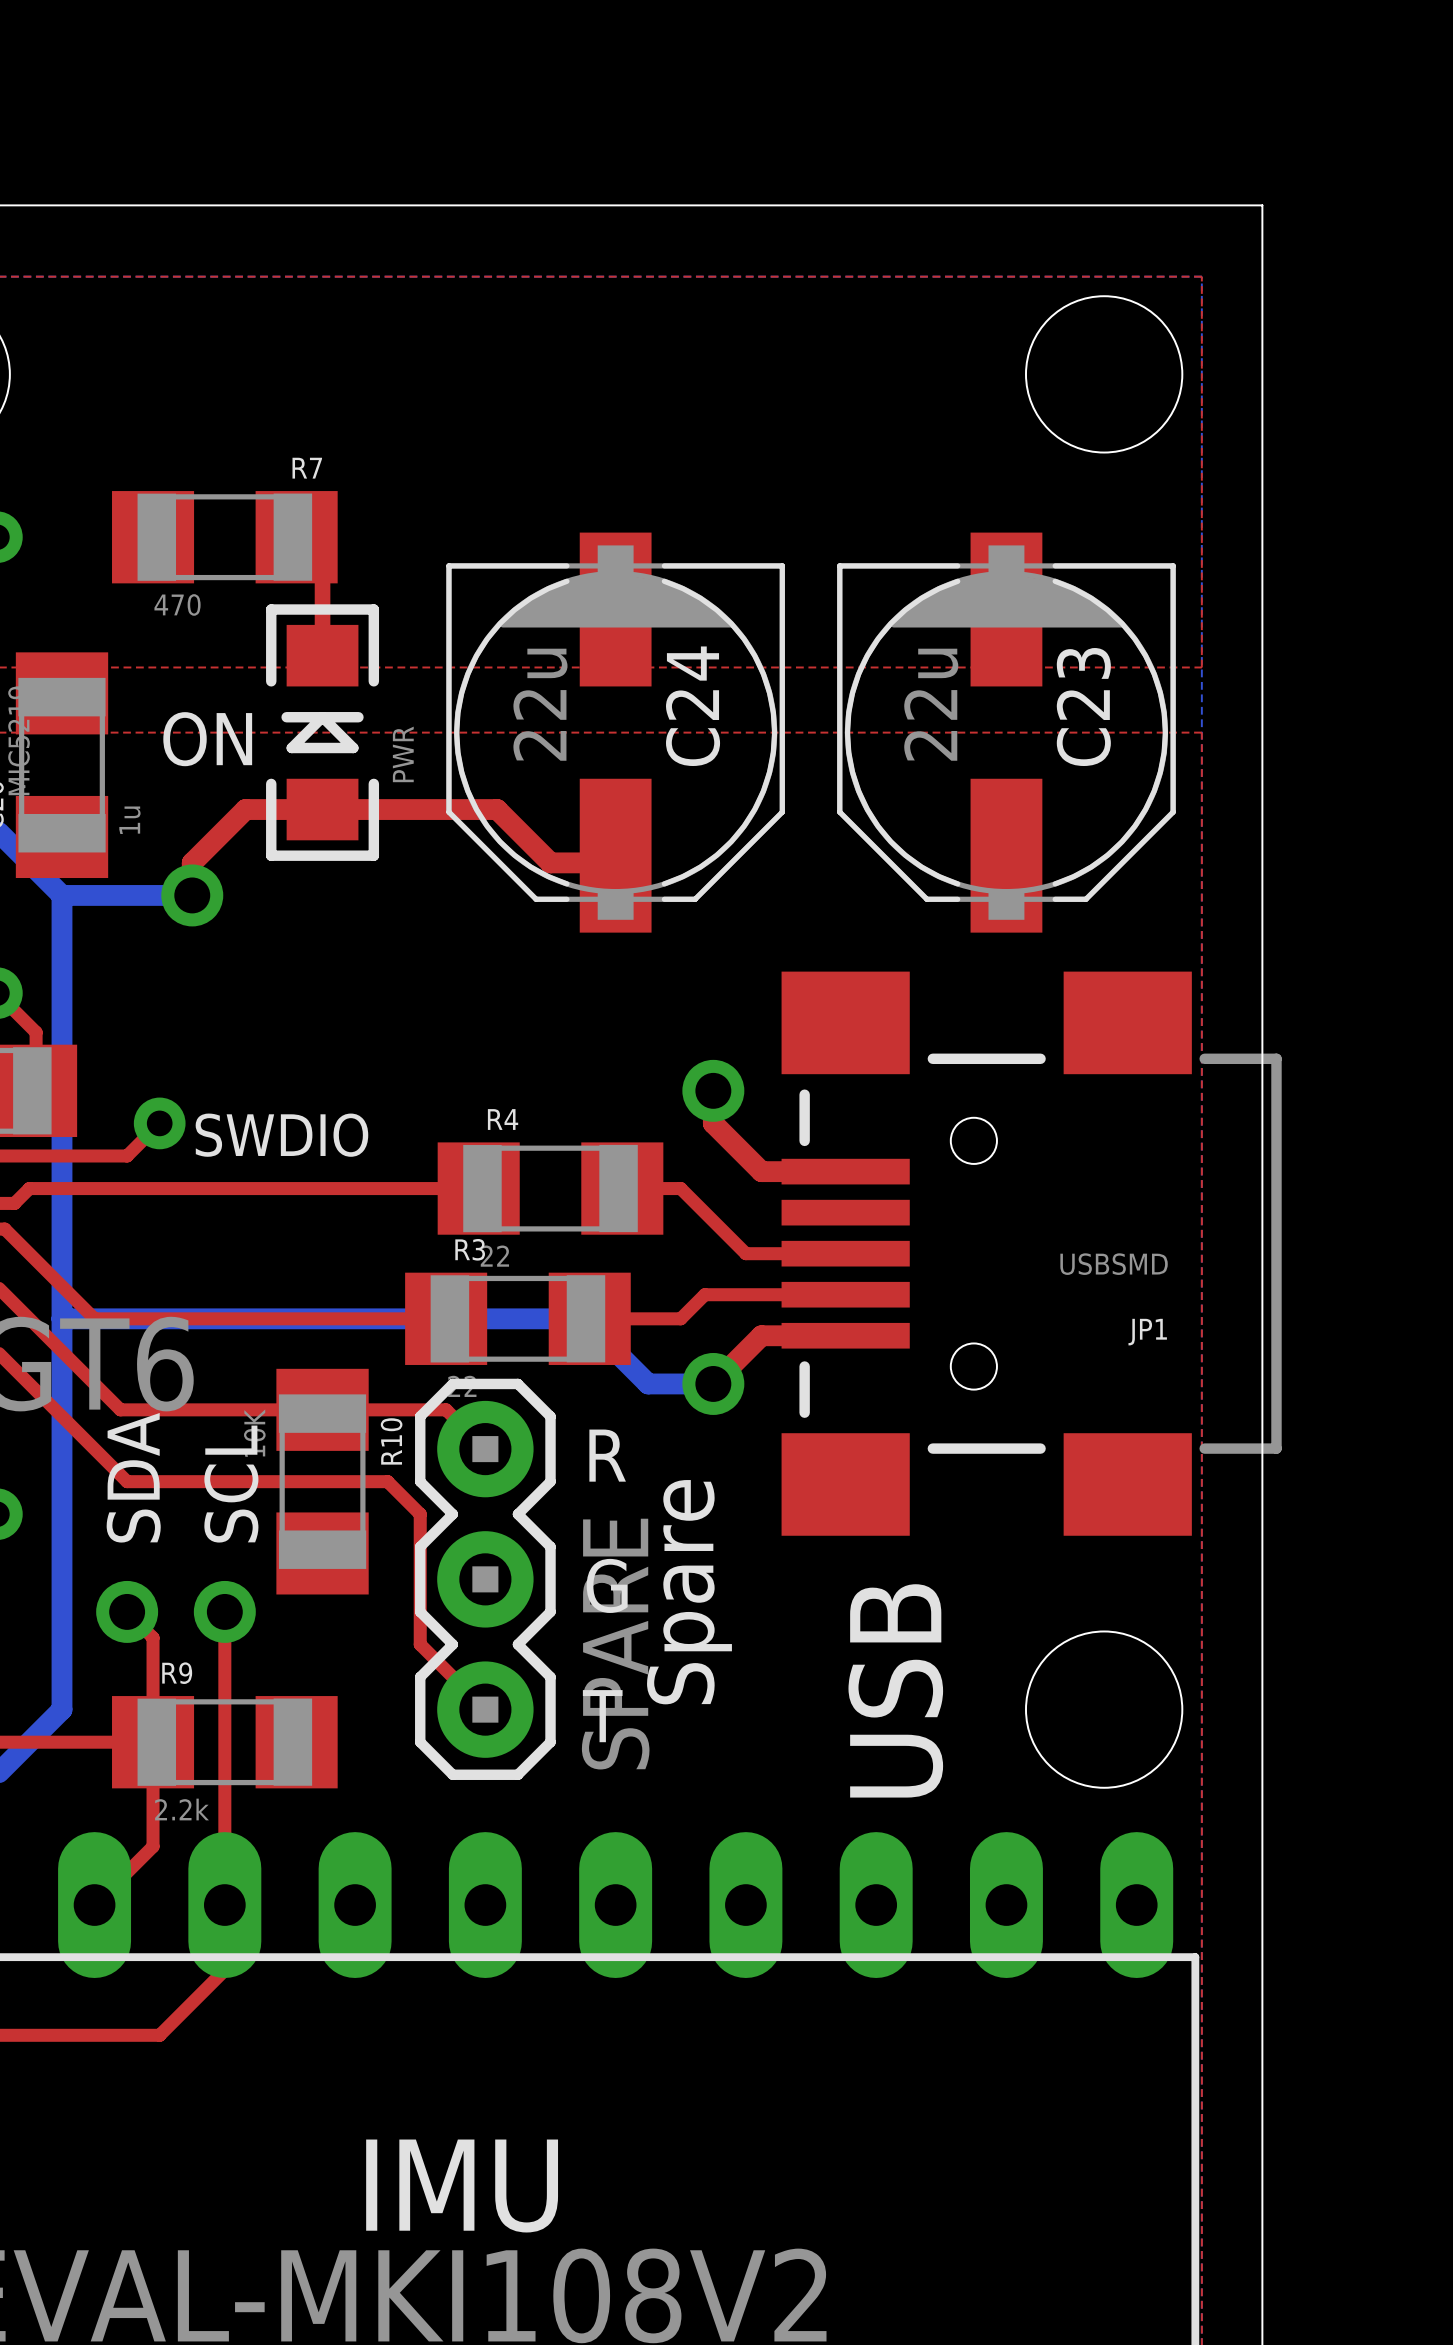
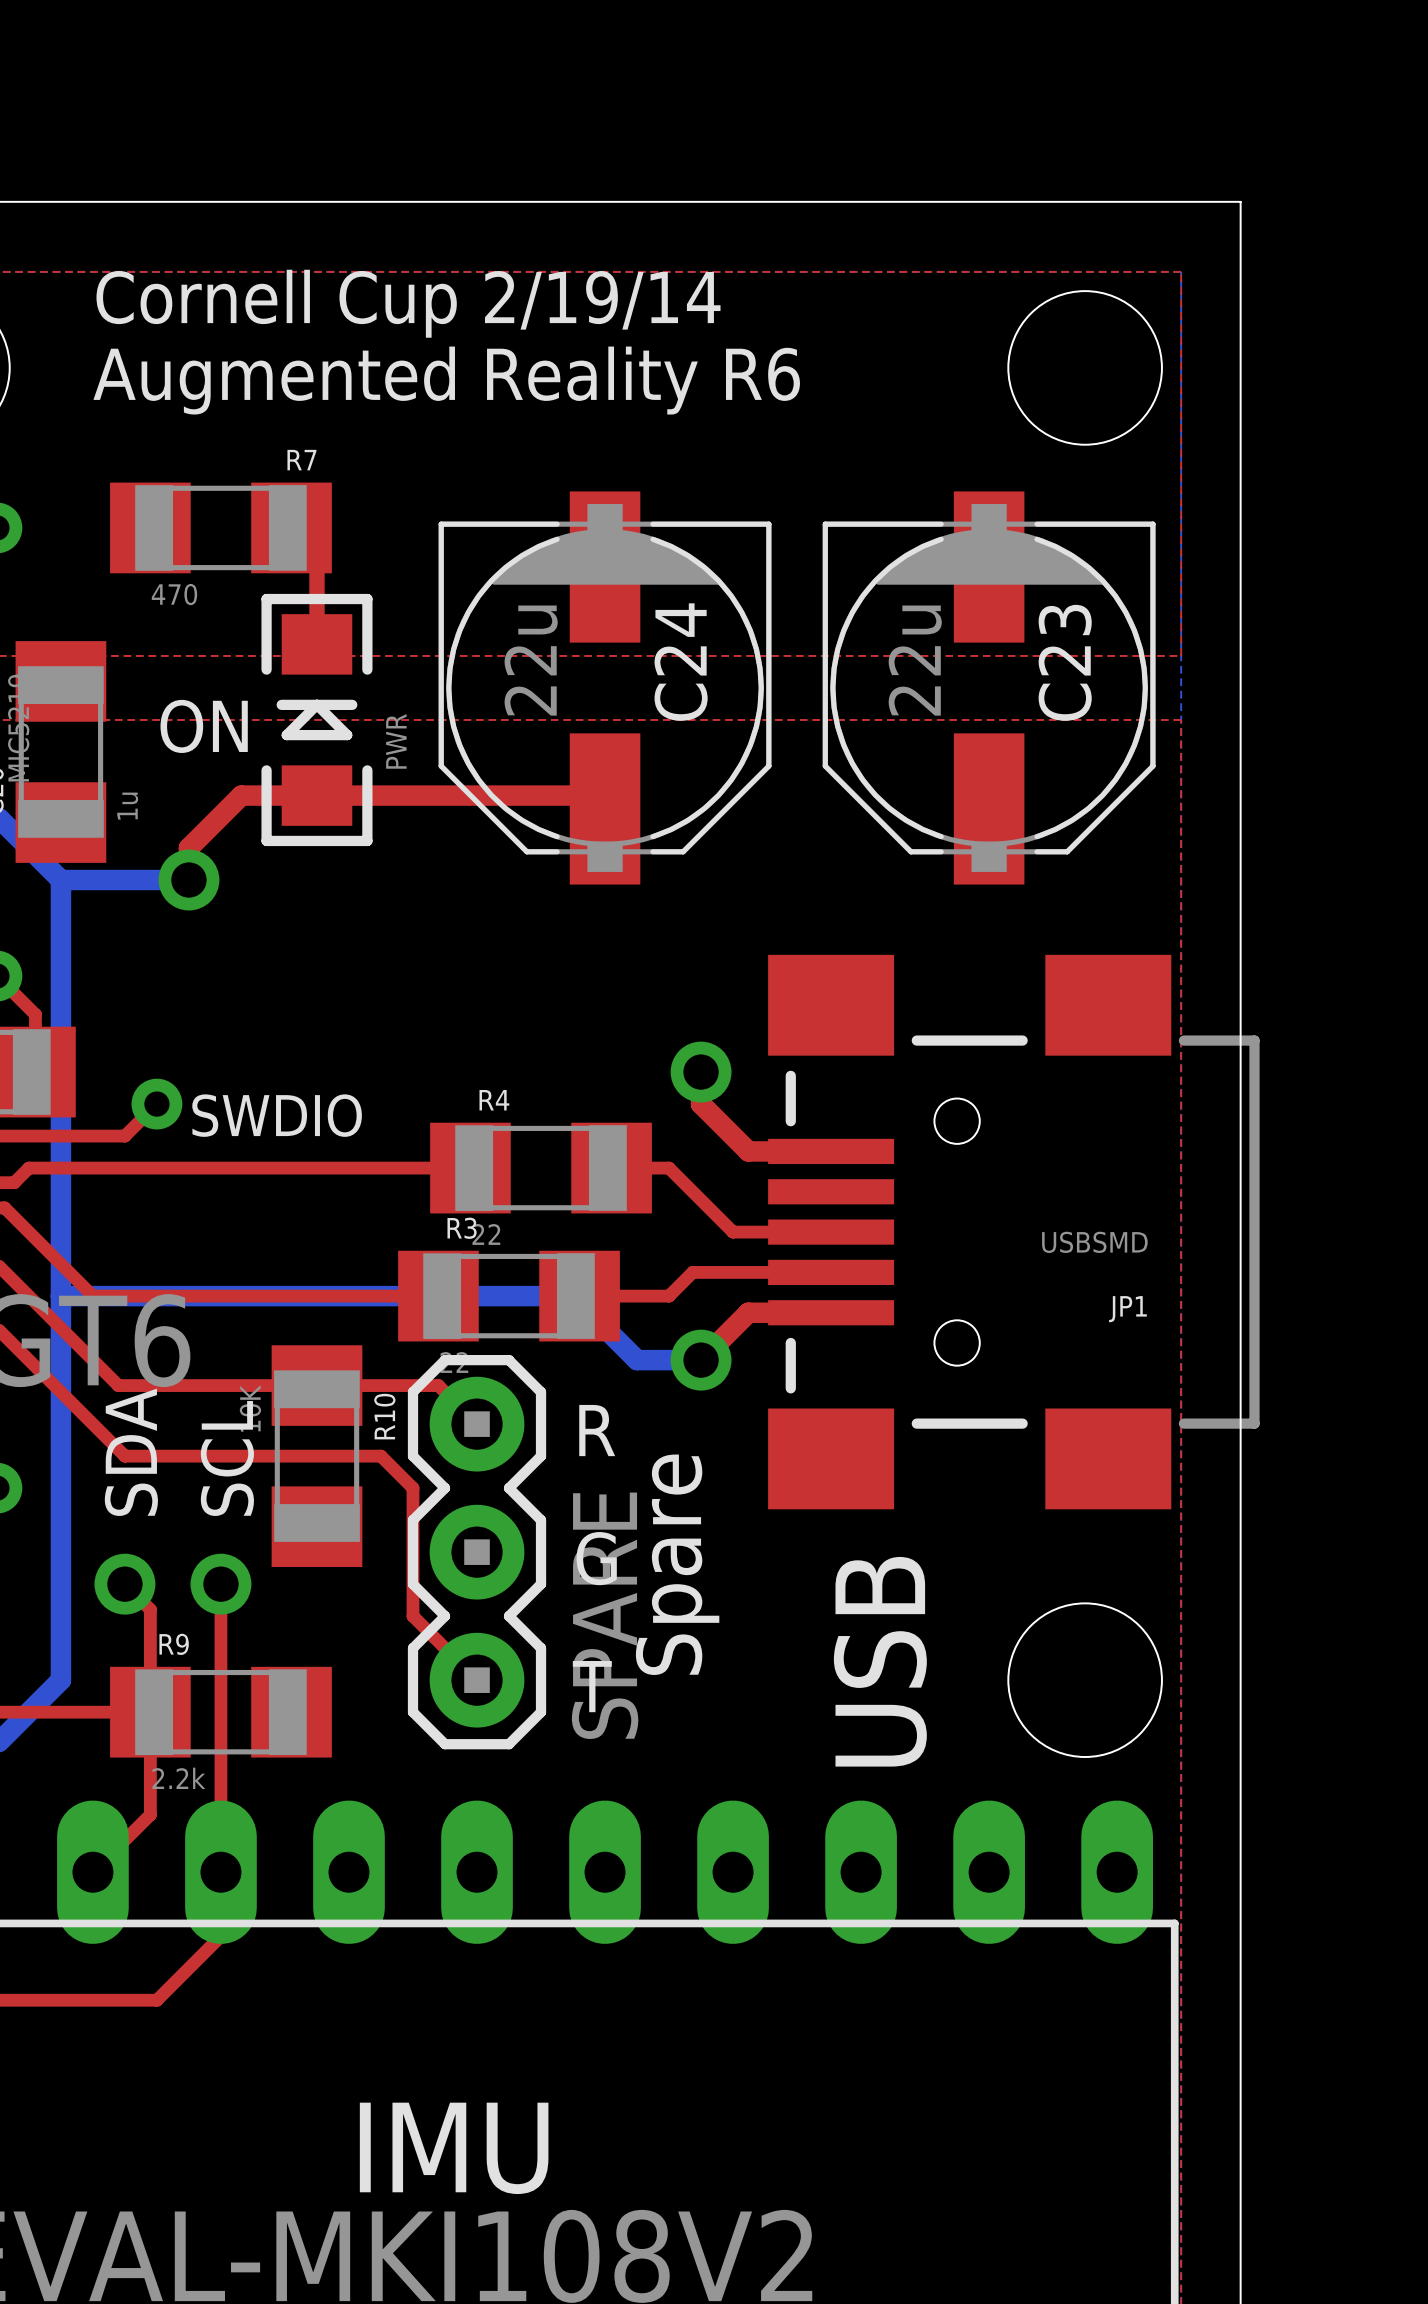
text: none -> Cornell Cup 2/19/14 (408, 303)
text: none -> Augmented Reality R6 (446, 380)
C24 position: (615, 732) -> (605, 687)
C23 position: (1006, 732) -> (989, 687)
top track: (497, 809) (550, 862) (608, 862) (615, 855) -> (488, 795) (591, 795) (605, 808)

